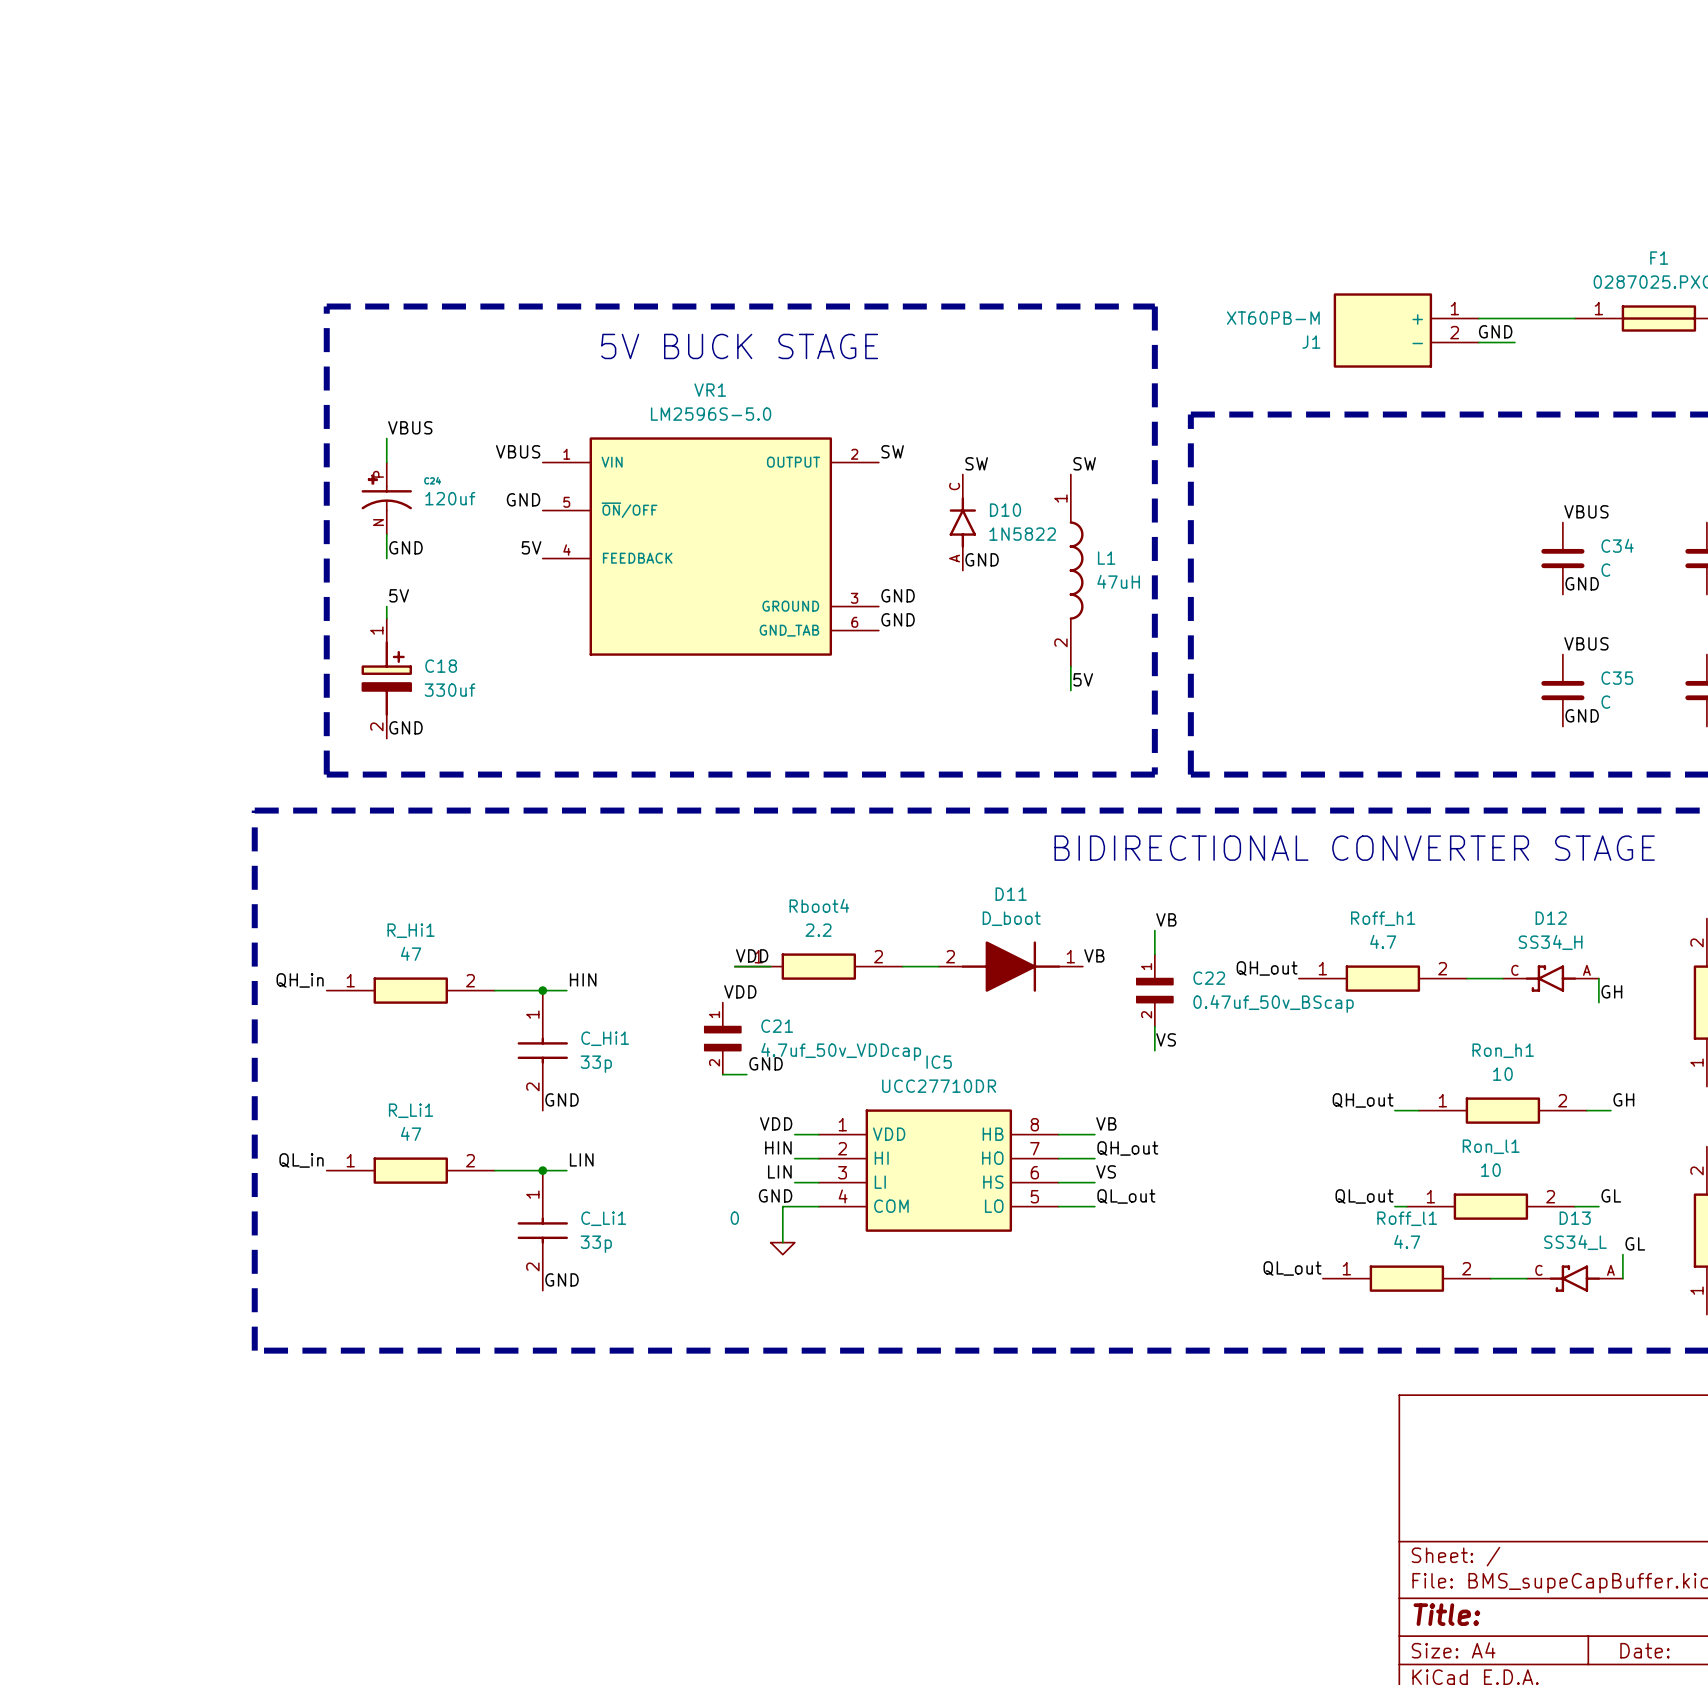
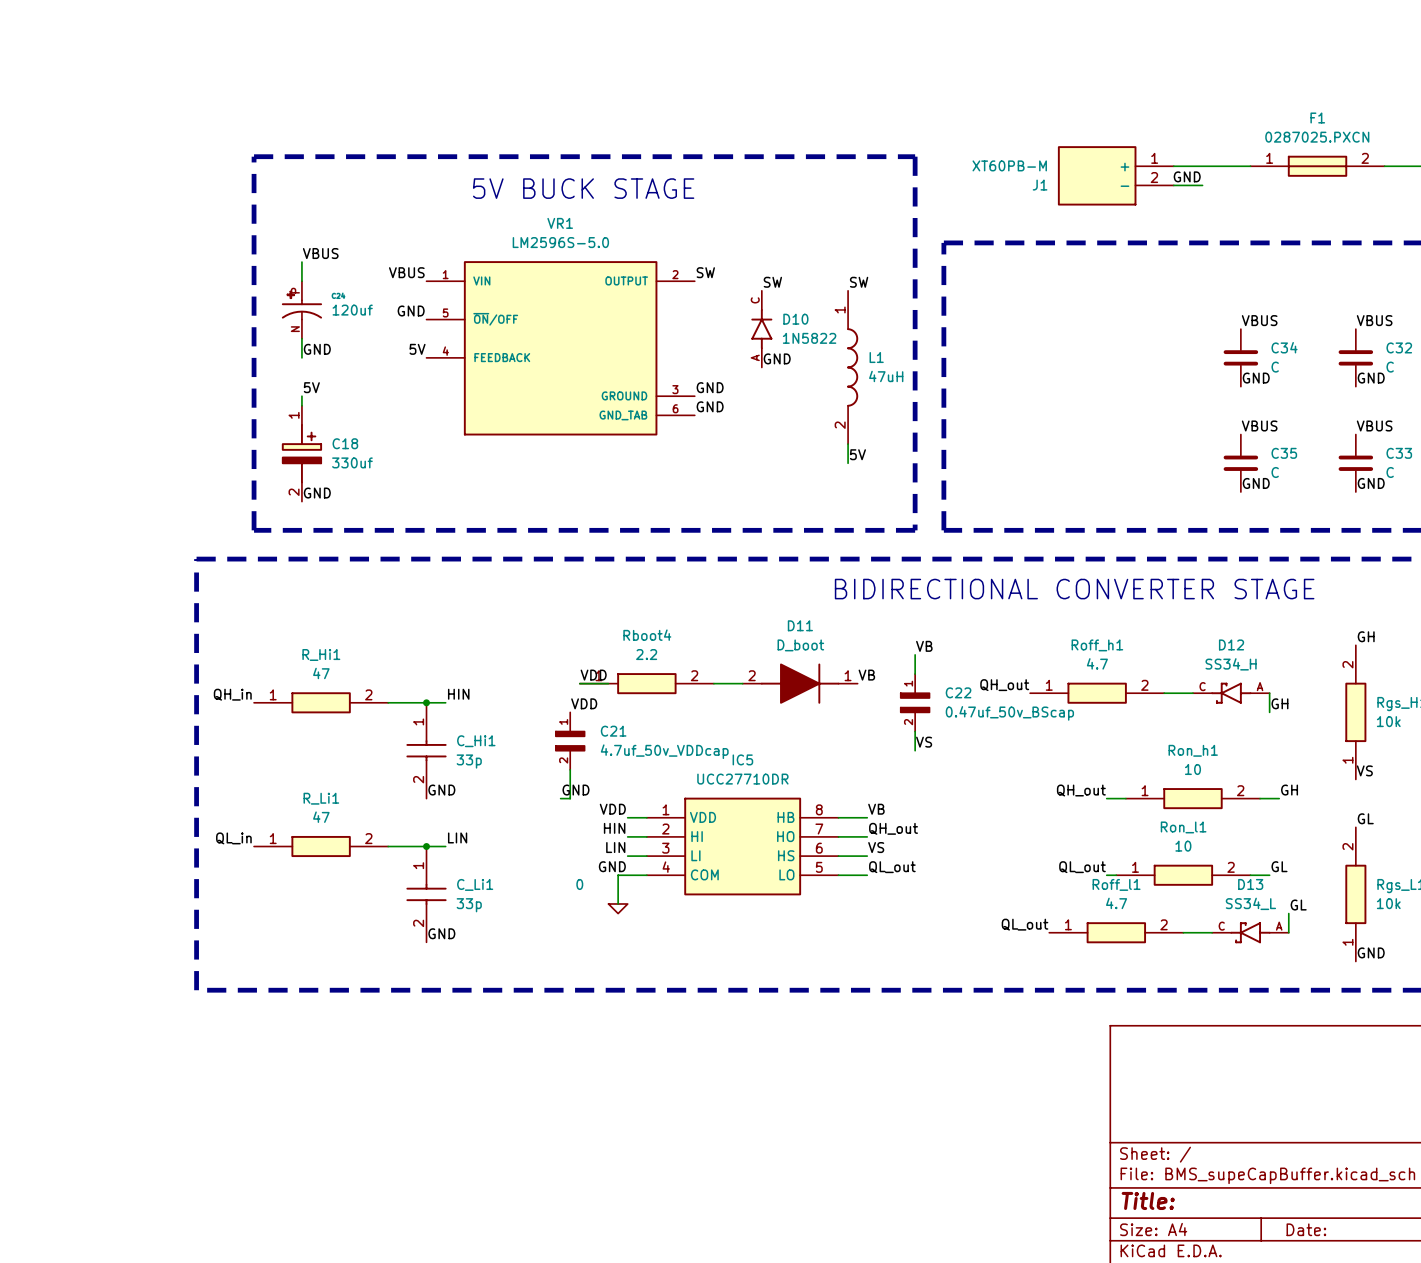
label position: GND (766, 1063) -> GND (575, 790)
wire: (722, 1074) (746, 1074) -> (570, 769) (570, 798) (560, 798)

